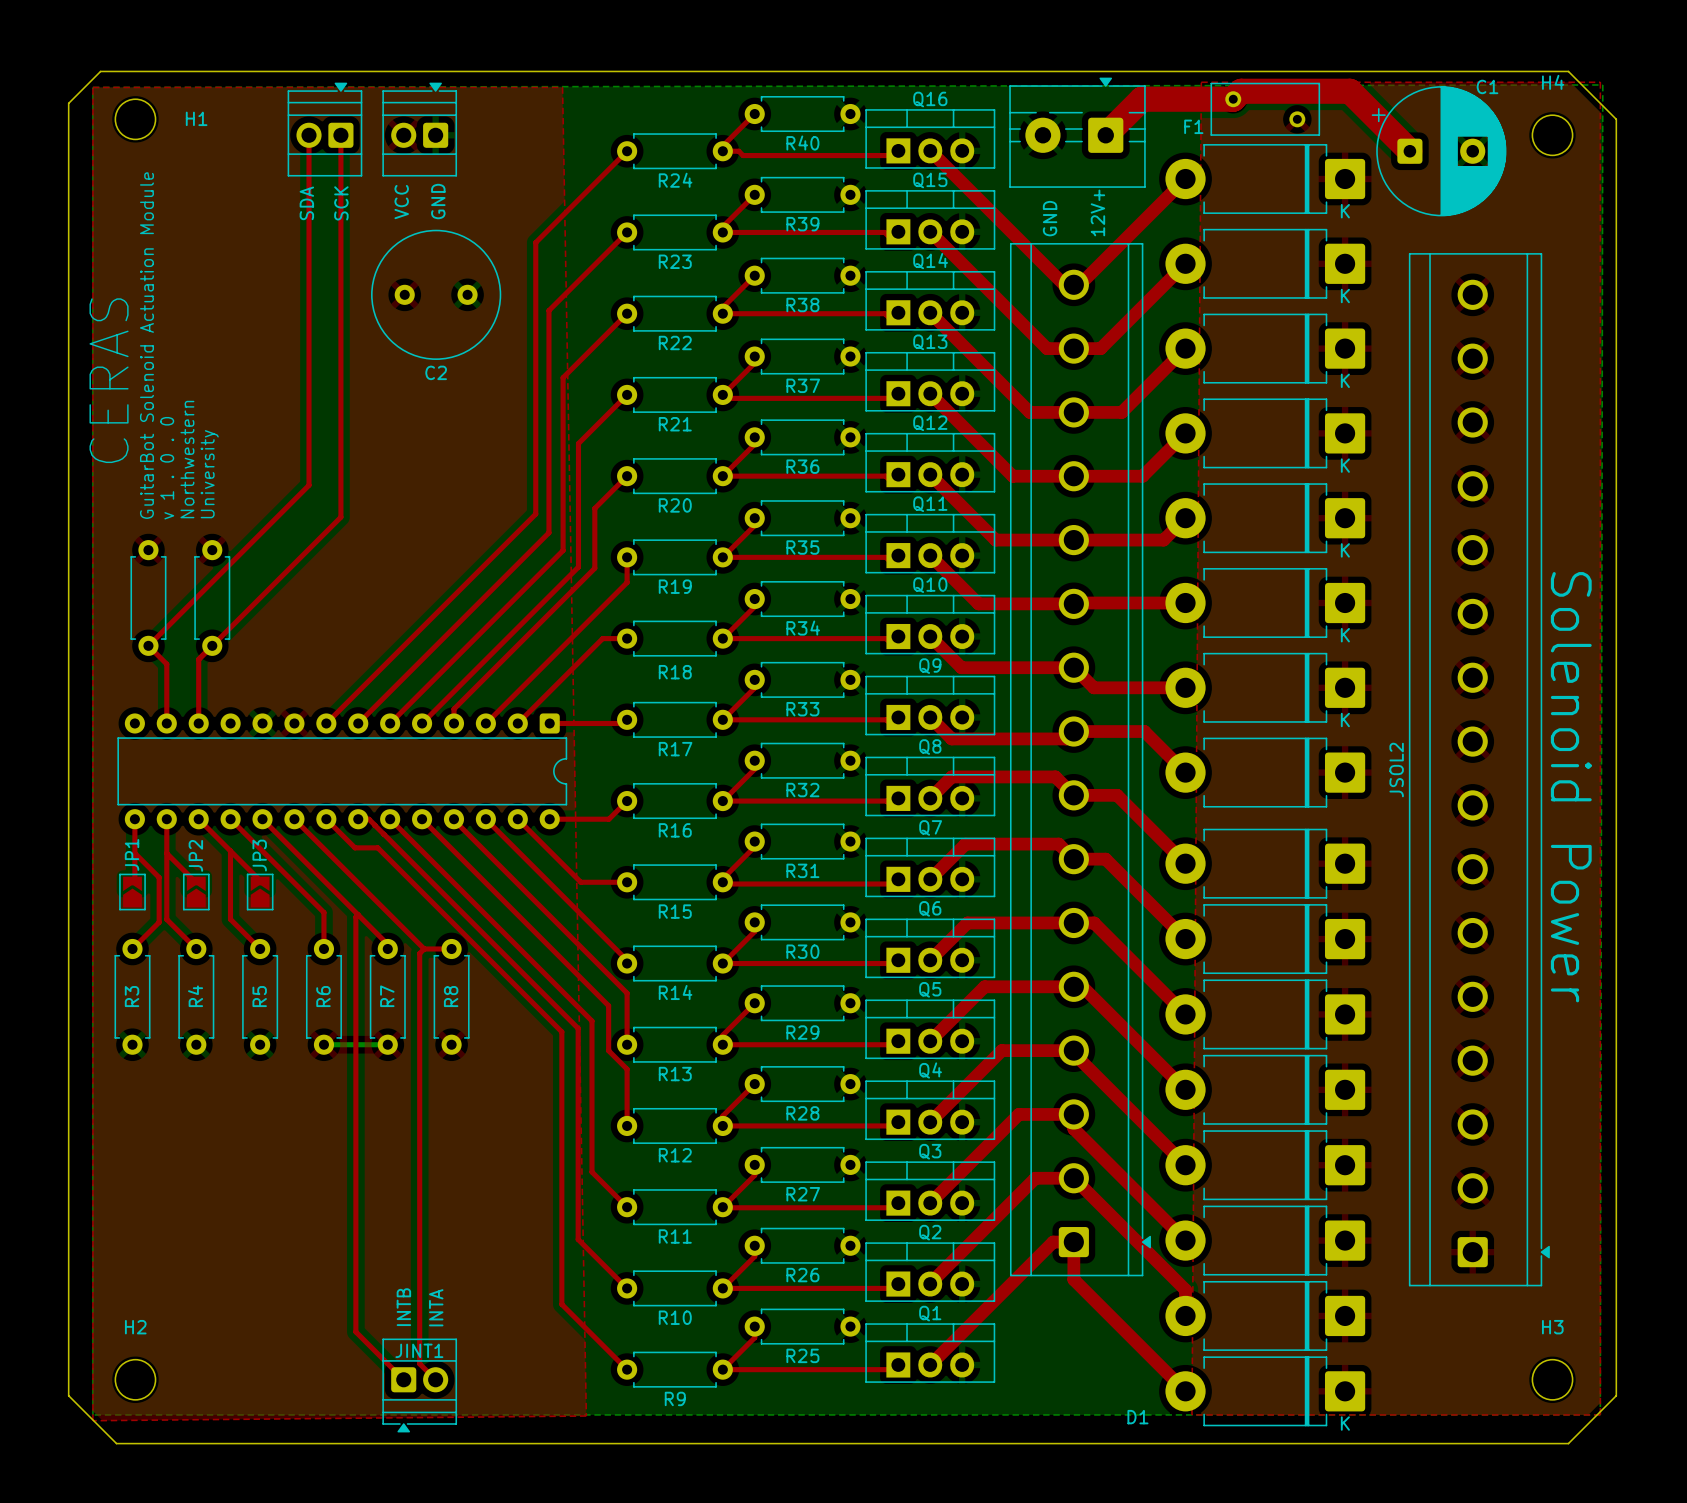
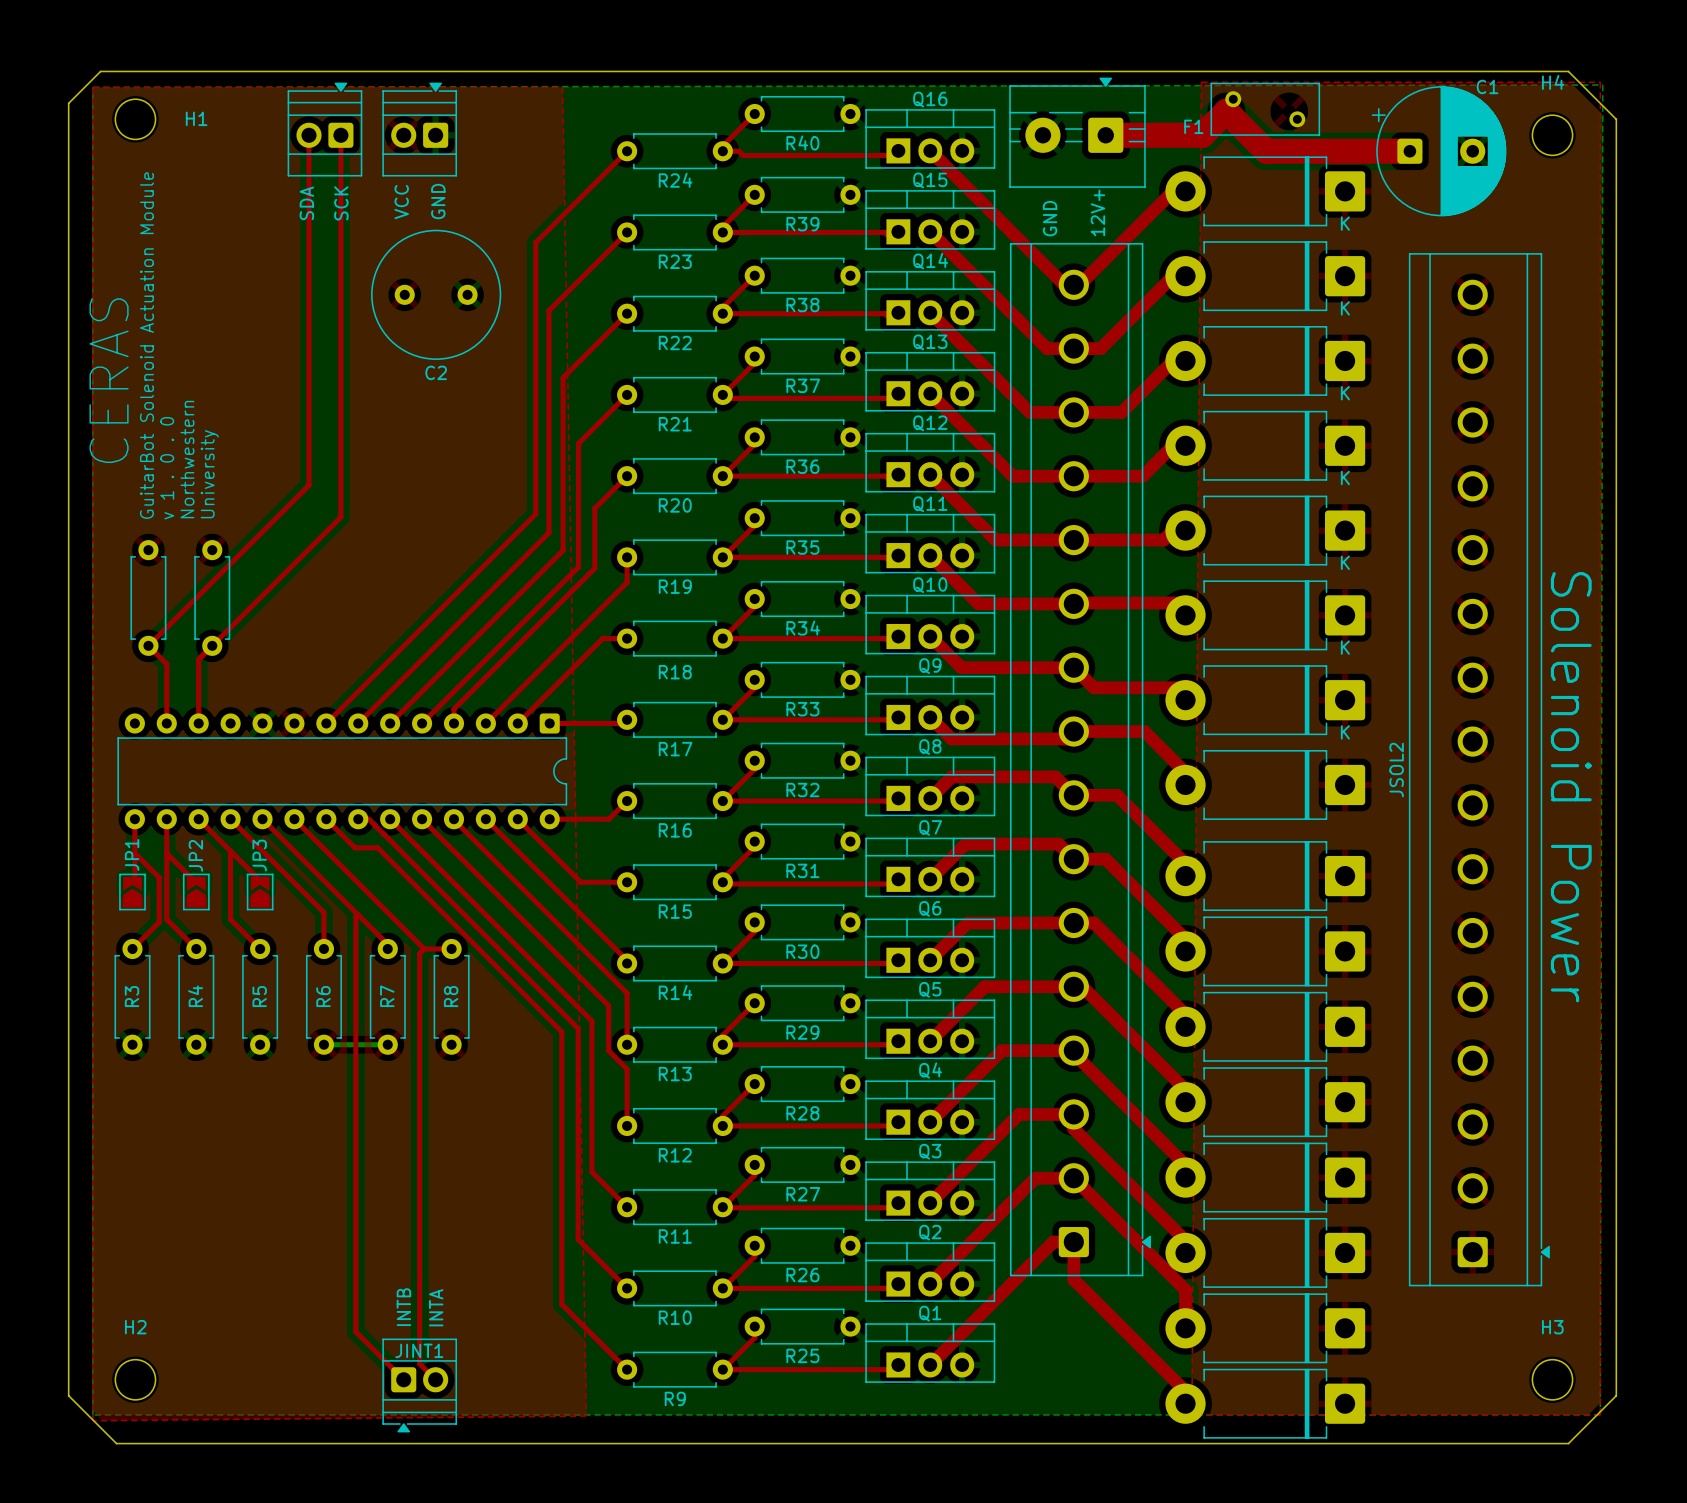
top track: (1105, 135) (1141, 99) (1233, 99) (1241, 91) (1349, 91) (1409, 151) -> (1105, 135) (1202, 135) (1226, 111) (1266, 151) (1409, 151)
part position: (1265, 179) -> (1265, 191)
part position: (1265, 263) -> (1265, 276)
part position: (1265, 348) -> (1265, 360)
part position: (1265, 433) -> (1265, 445)
part position: (1265, 518) -> (1265, 530)
part position: (1265, 603) -> (1265, 615)
part position: (1265, 687) -> (1265, 700)
part position: (1265, 772) -> (1265, 784)
part position: (1265, 863) -> (1265, 876)
part position: (1265, 939) -> (1265, 951)
part position: (1265, 1014) -> (1265, 1026)
part position: (1265, 1089) -> (1265, 1102)
part position: (1265, 1165) -> (1265, 1177)
part position: (1265, 1240) -> (1265, 1252)
part position: (1265, 1315) -> (1265, 1328)
D1 position: (1265, 1391) -> (1265, 1403)
D1 name: D1 (1137, 1417) -> none
D1 text: K (1345, 1423) -> none

